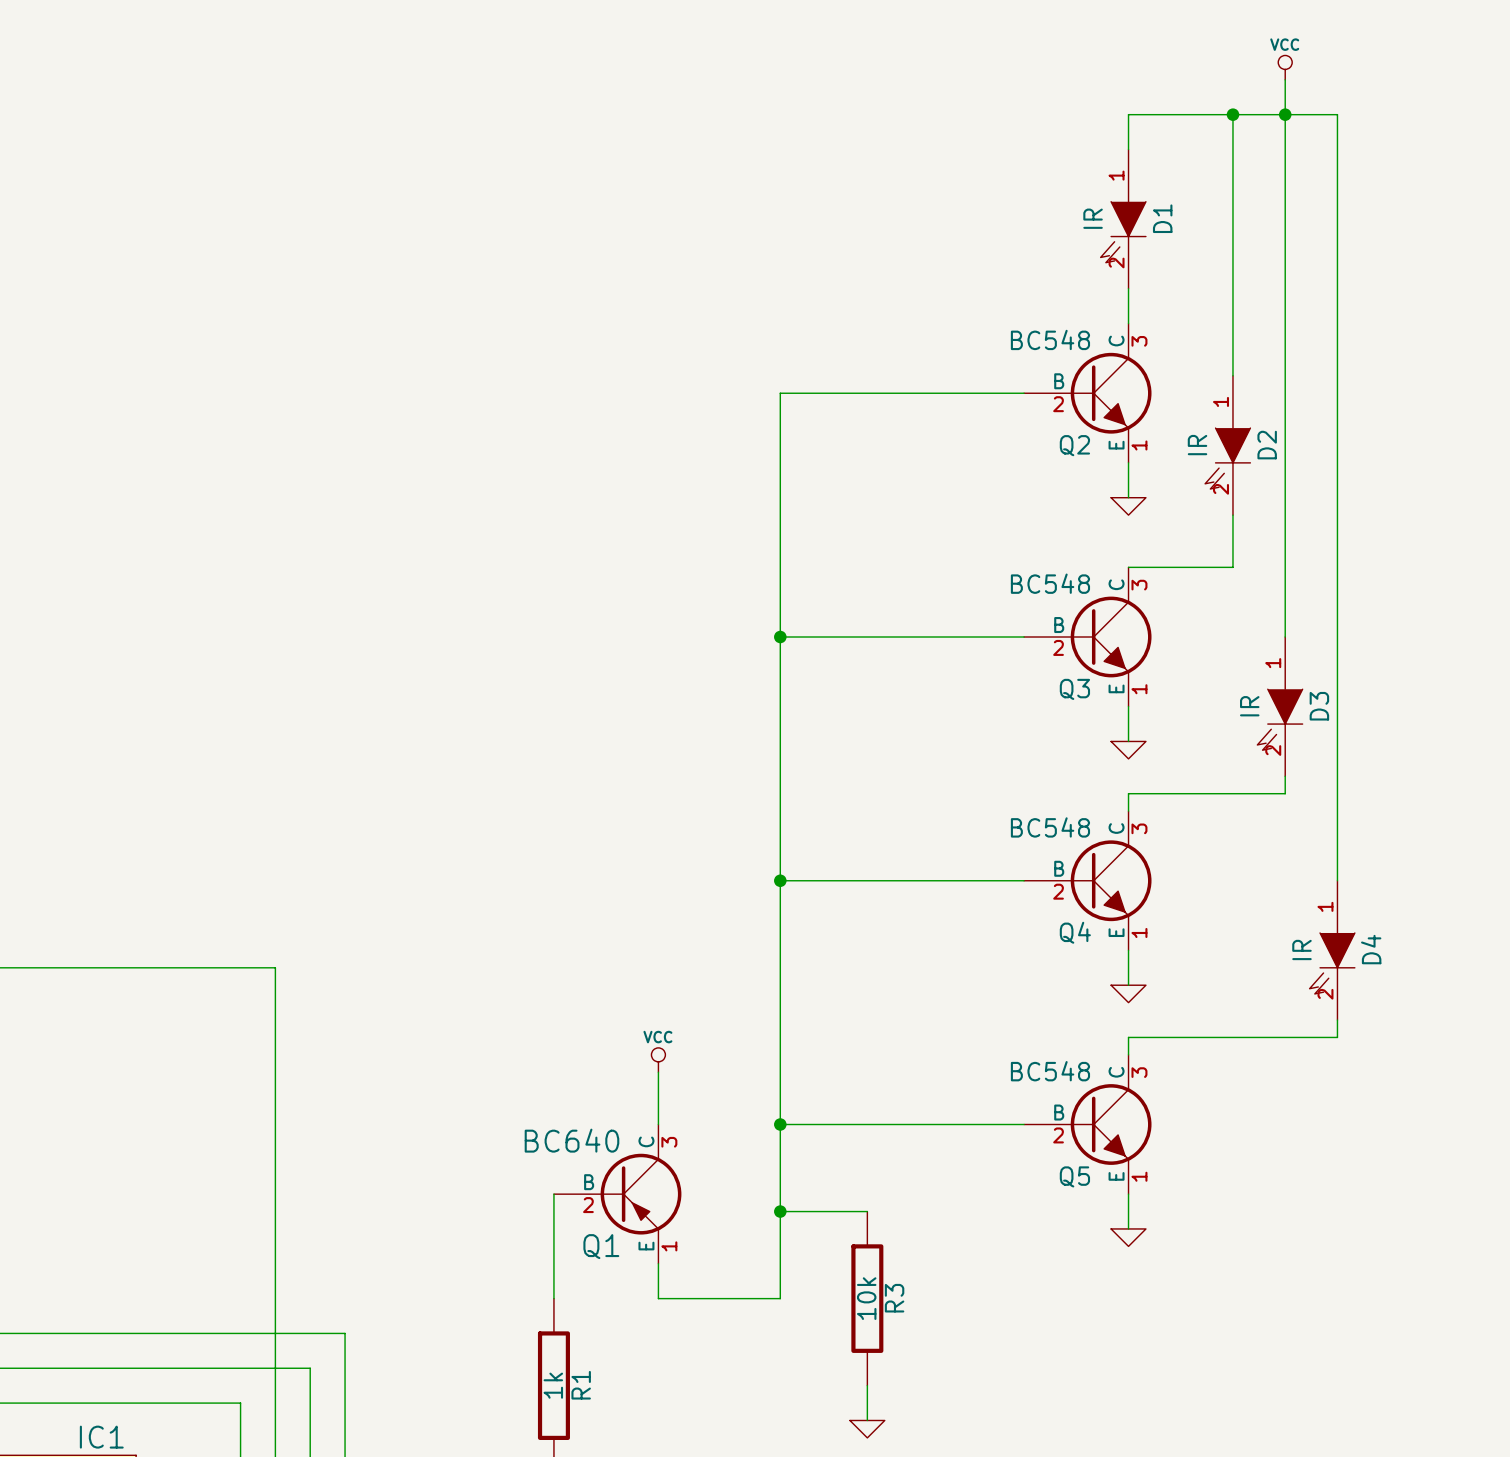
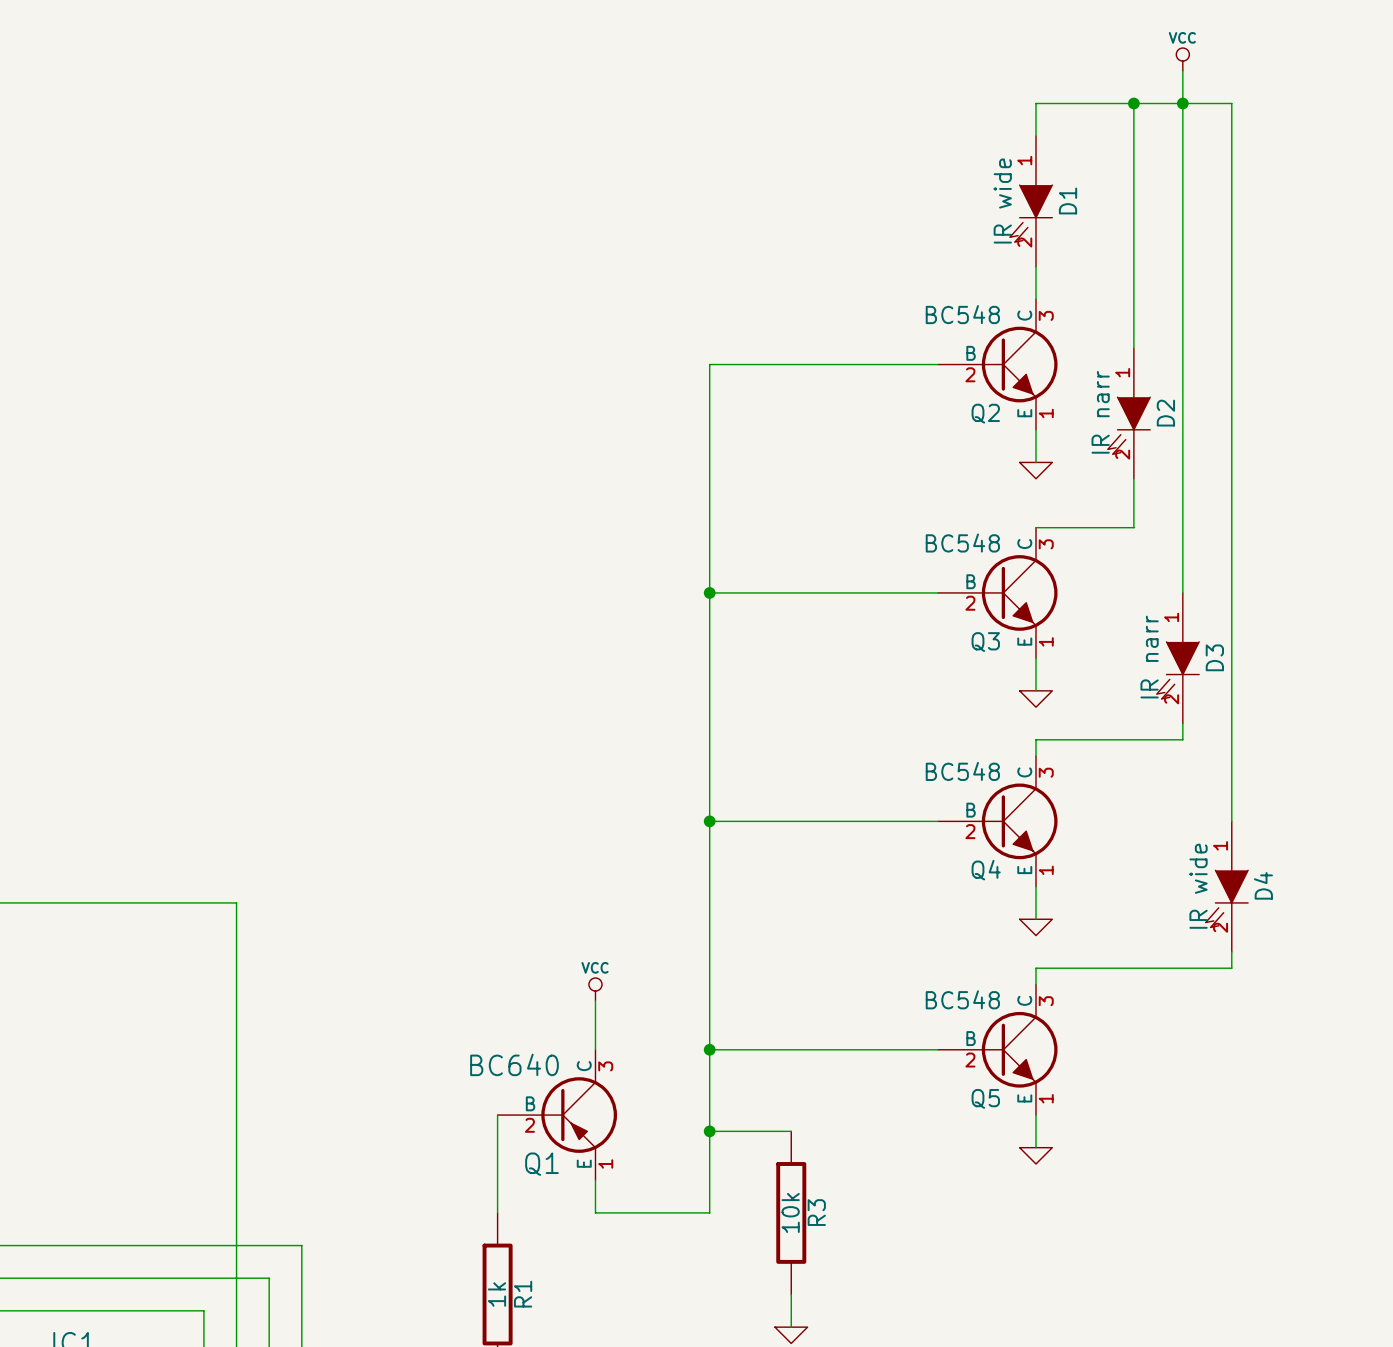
D1 value: IR (1093, 218) -> IR wide (1002, 201)
D2 value: IR (1197, 445) -> IR narr (1100, 412)
D3 value: IR (1249, 706) -> IR narr (1149, 657)
D4 value: IR (1301, 949) -> IR wide (1198, 886)

